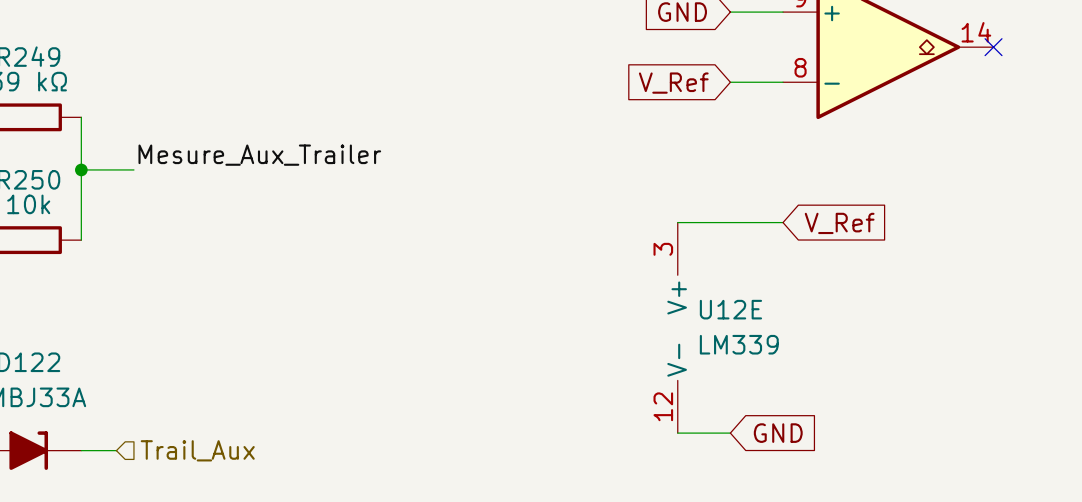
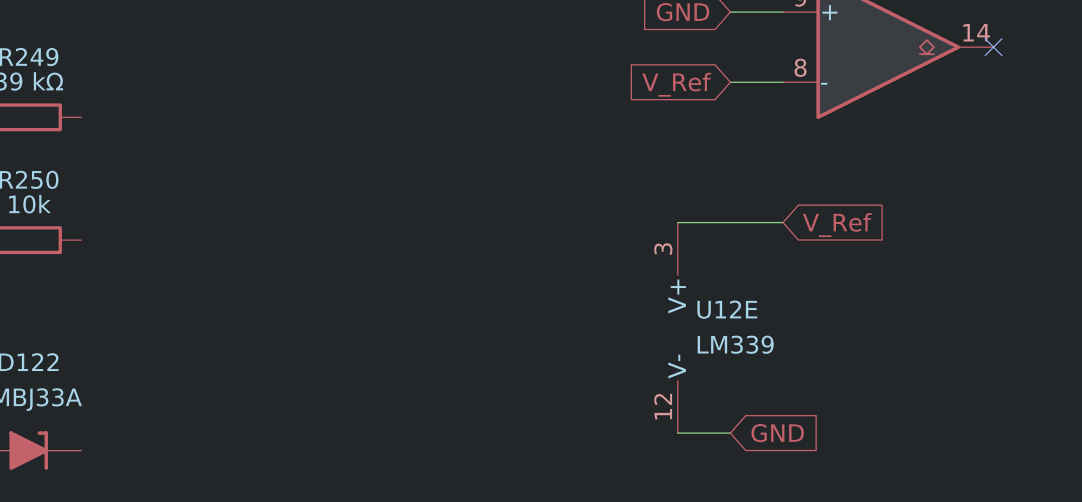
wire: (81, 117) (81, 240) -> none
label: Mesure_Aux_Trailer (259, 155) -> none
wire: (81, 169) (133, 169) -> none
junction: (81, 169) -> none
wire: (81, 450) (116, 450) -> none
hierarchical label: Trail_Aux (197, 450) -> none

